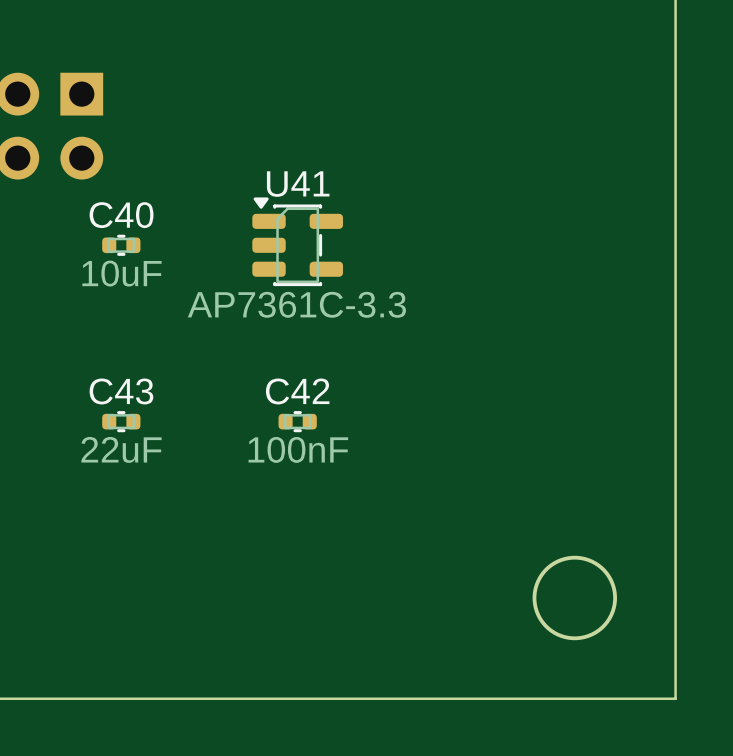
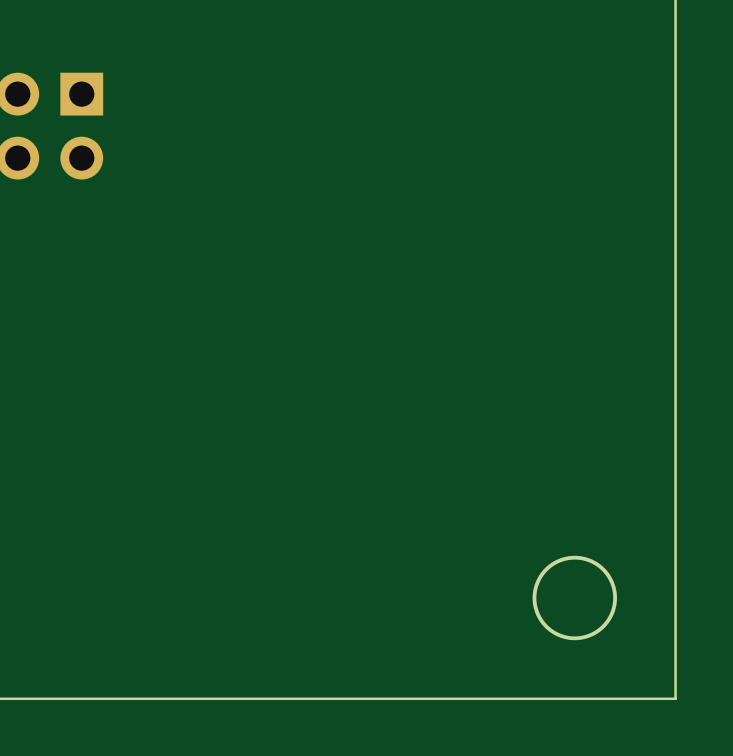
U41: AP7361C-3.3 (297, 241) -> none
C40: 10uF (121, 245) -> none
C43: 22uF (121, 421) -> none
C42: 100nF (297, 421) -> none

